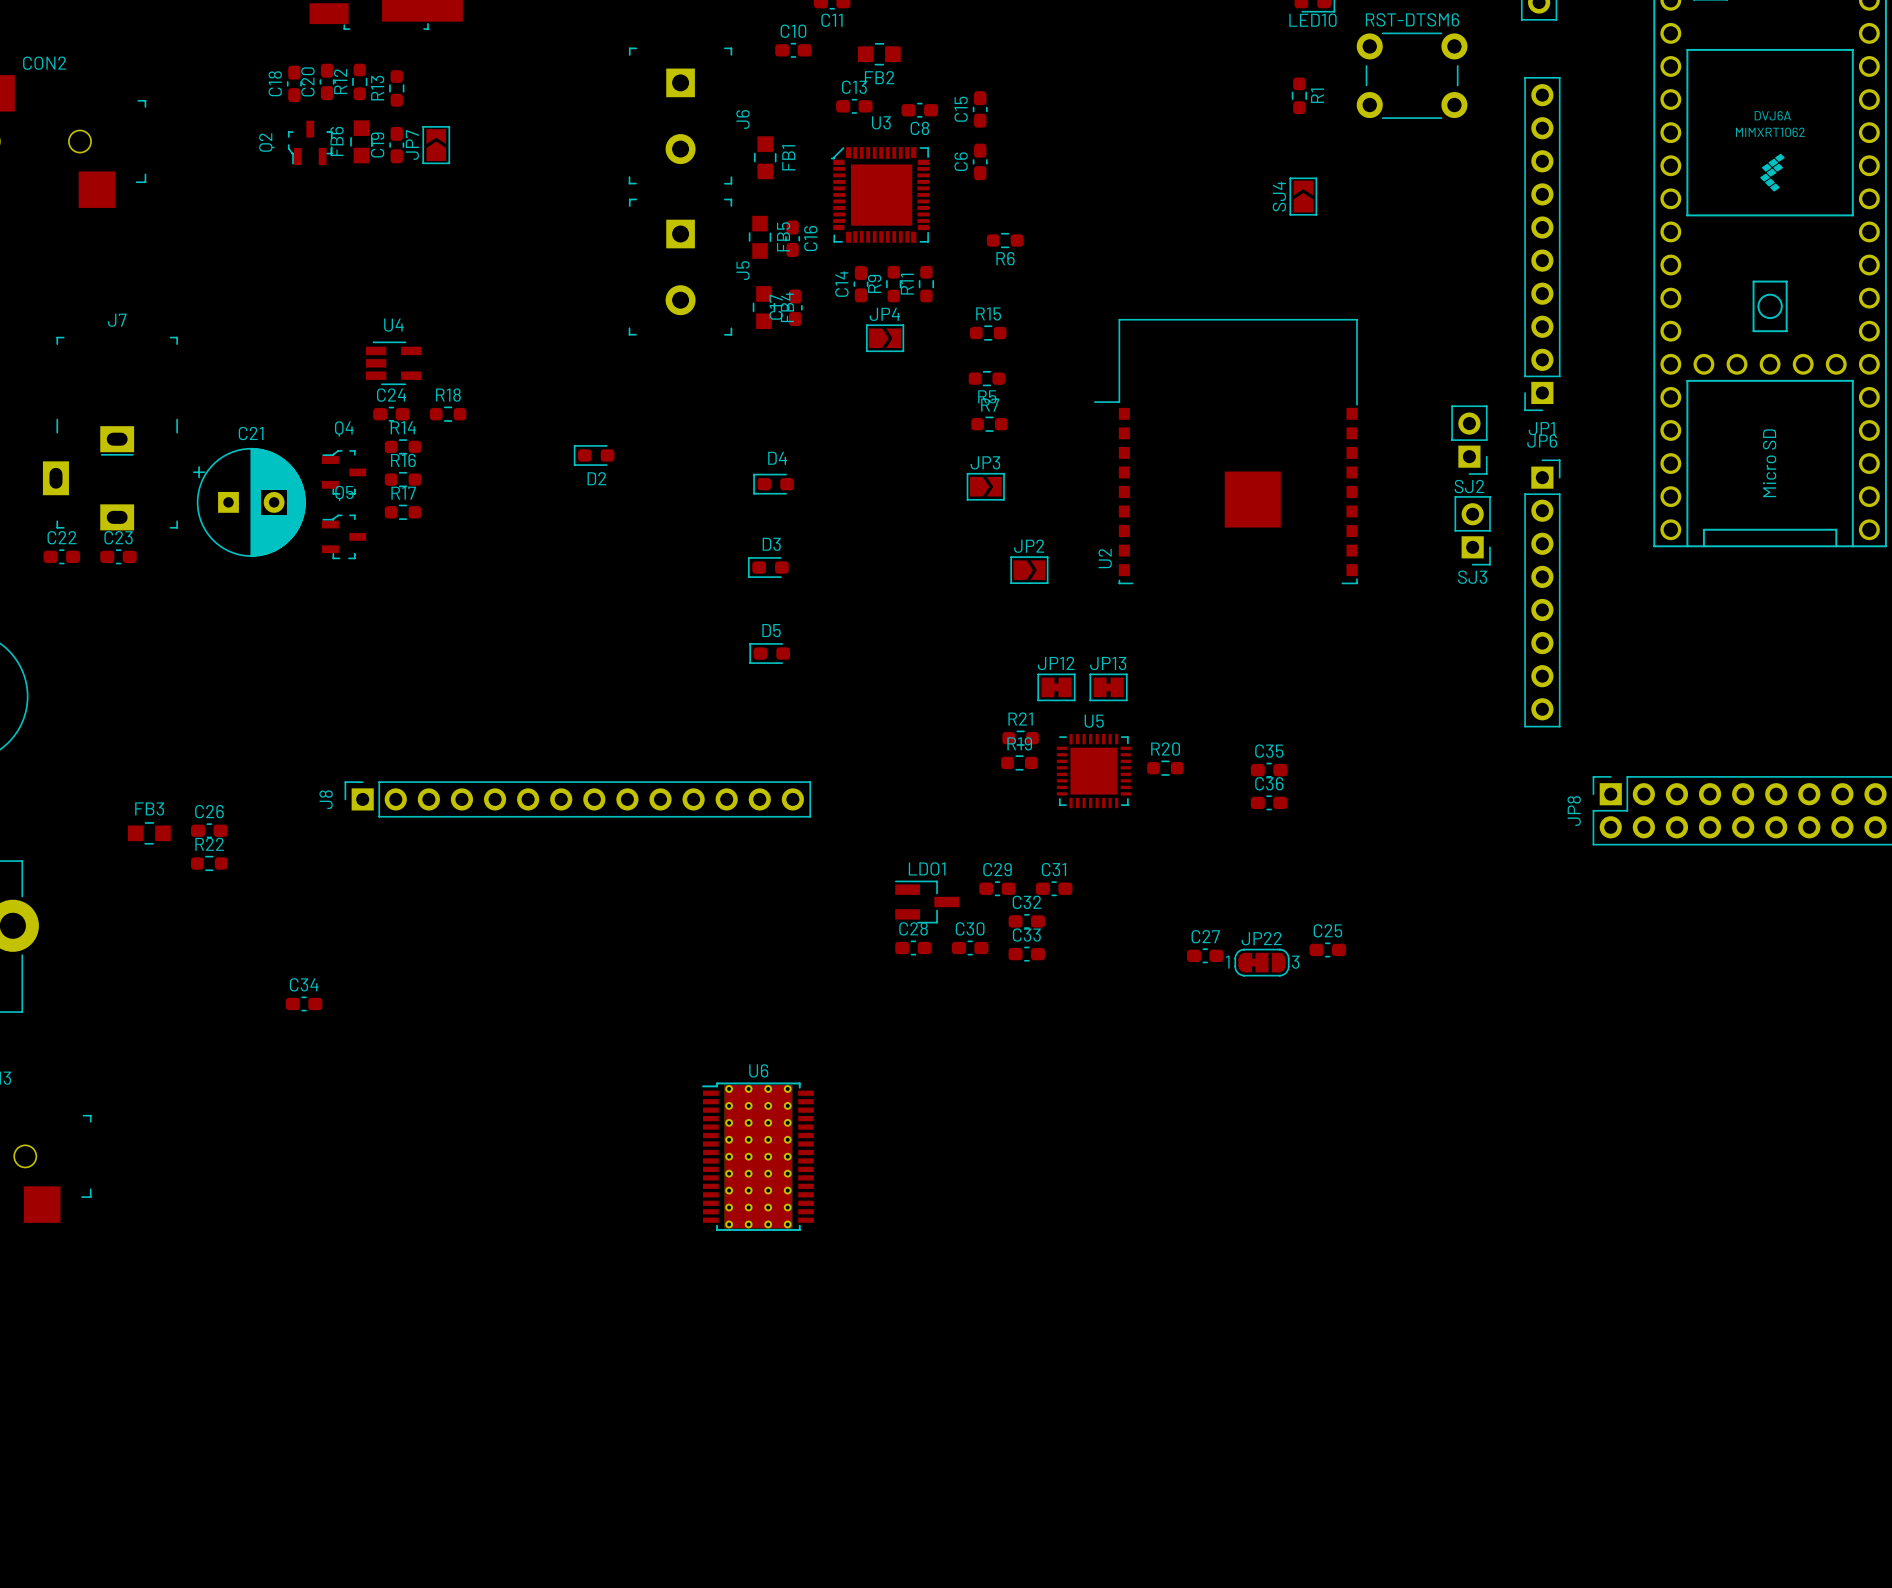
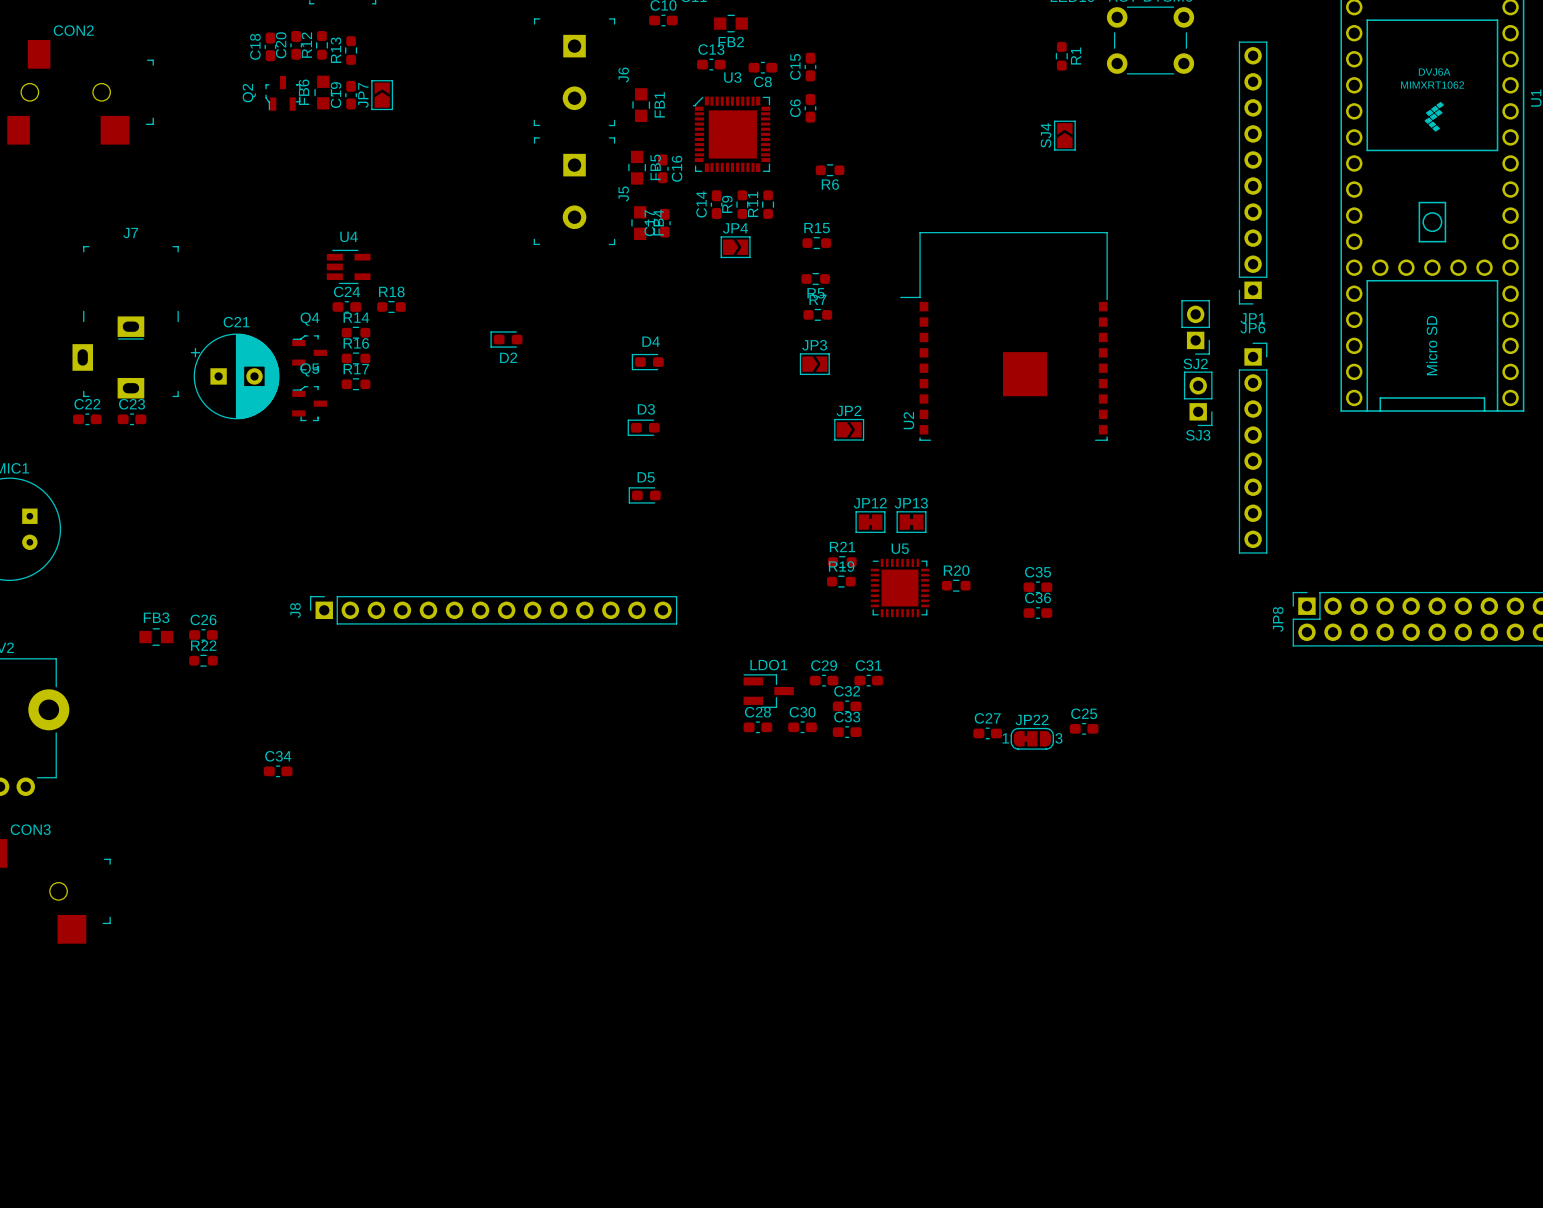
U6: (757, 1156) -> none

